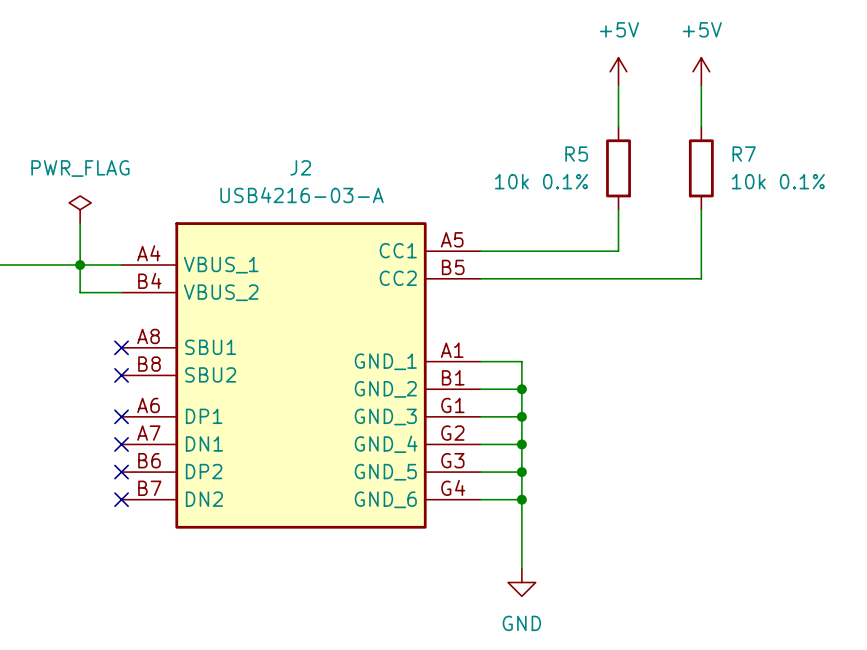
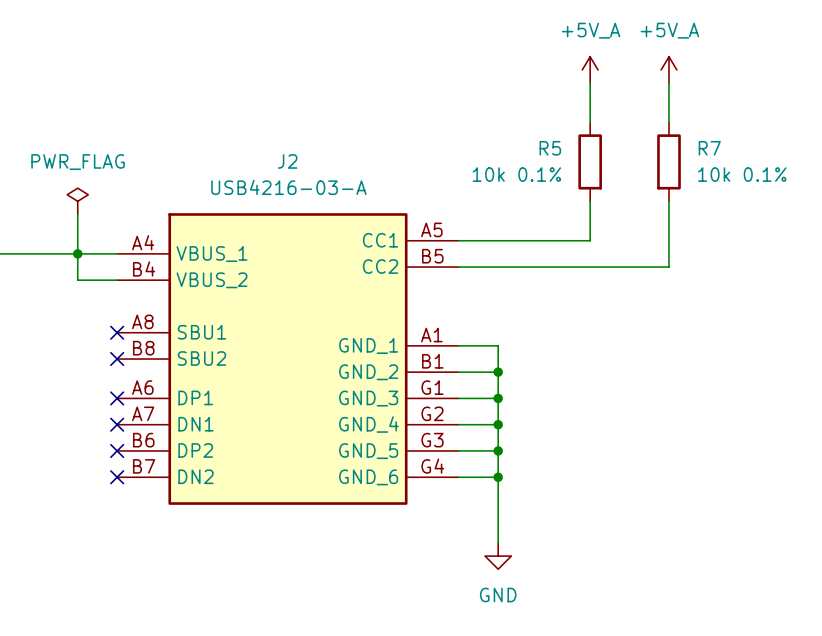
power symbol: +5V (618, 71) -> +5V_A (590, 69)
power symbol: +5V (701, 71) -> +5V_A (668, 69)

